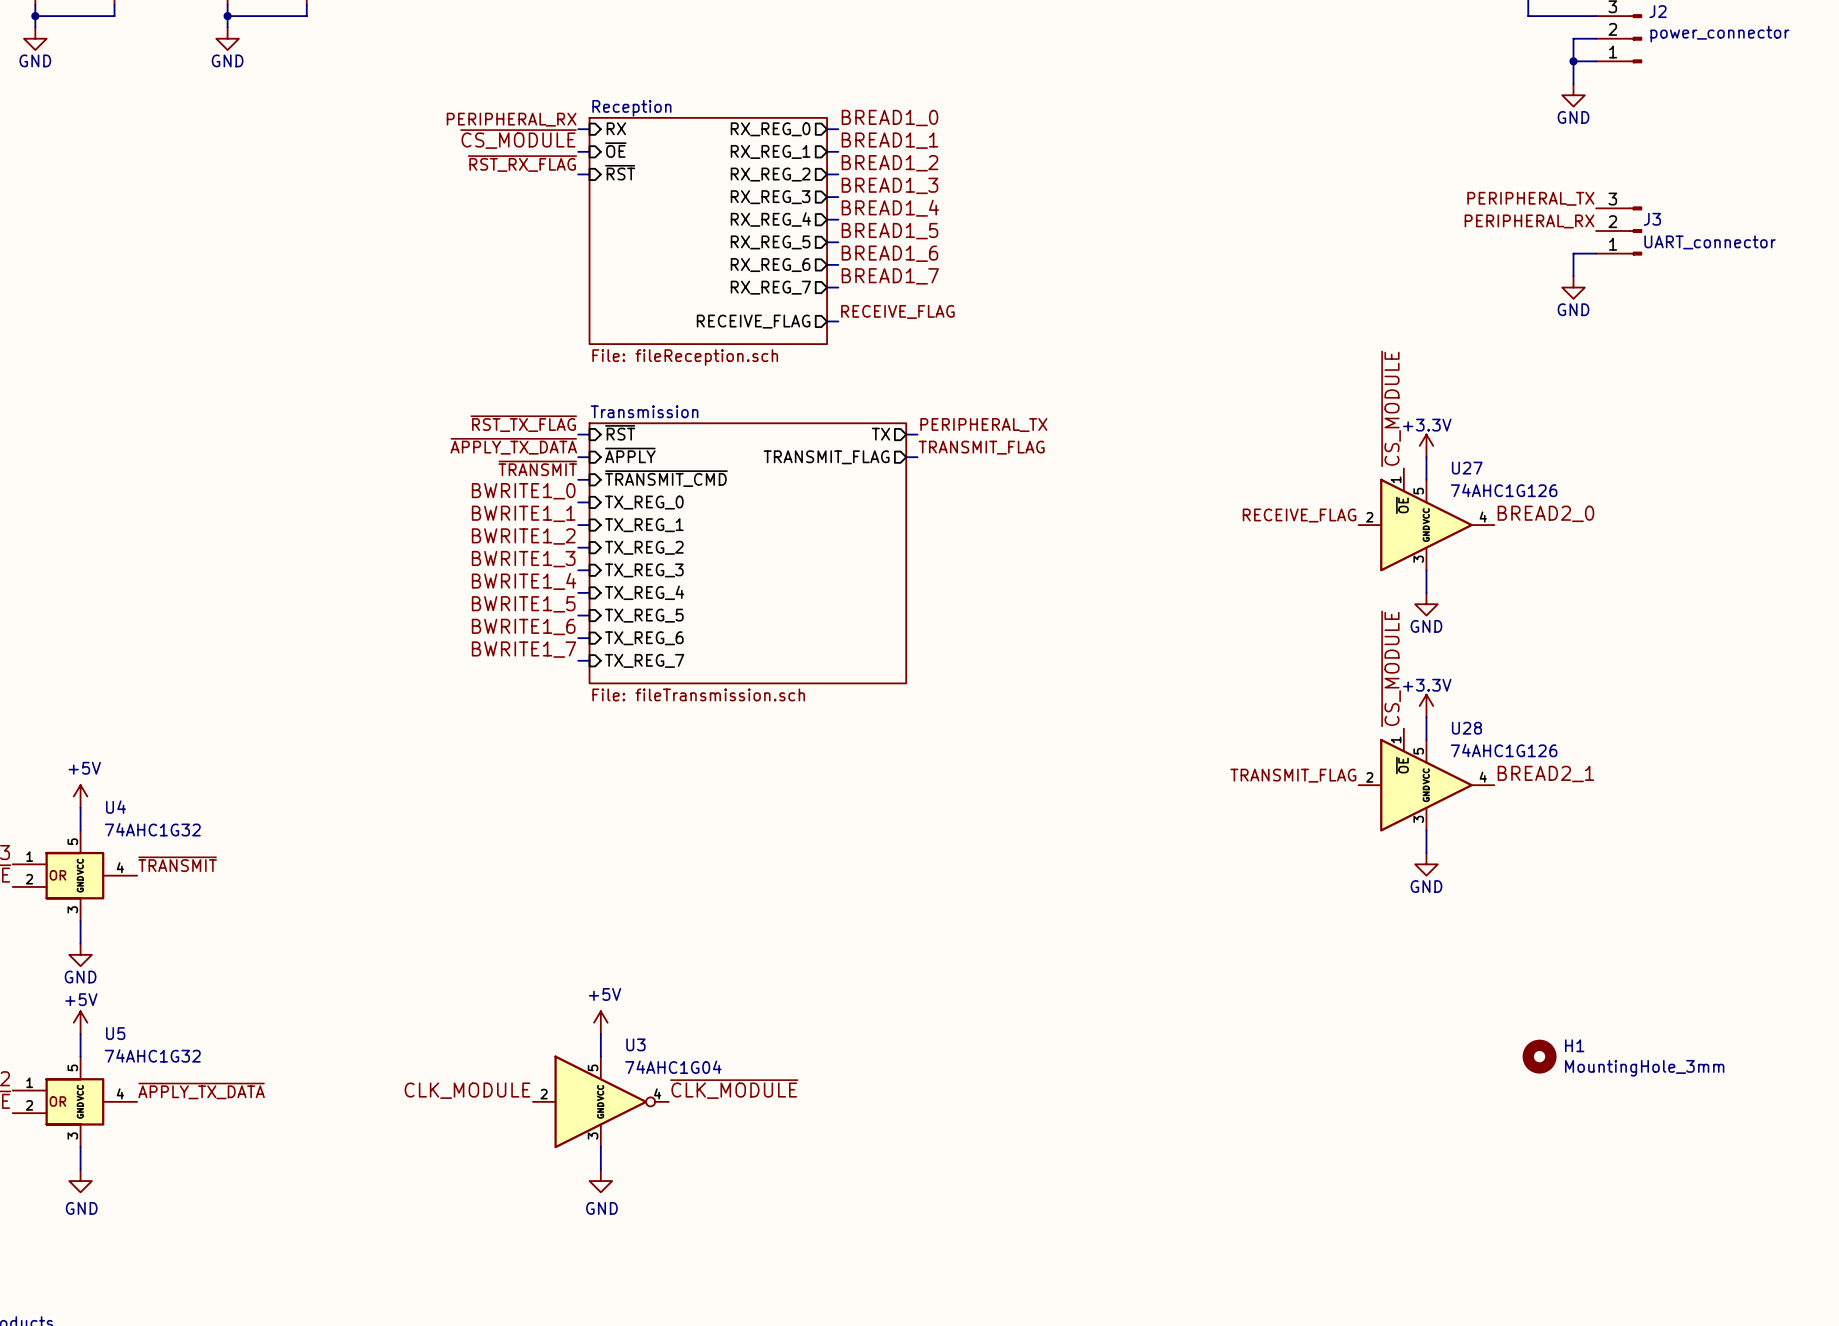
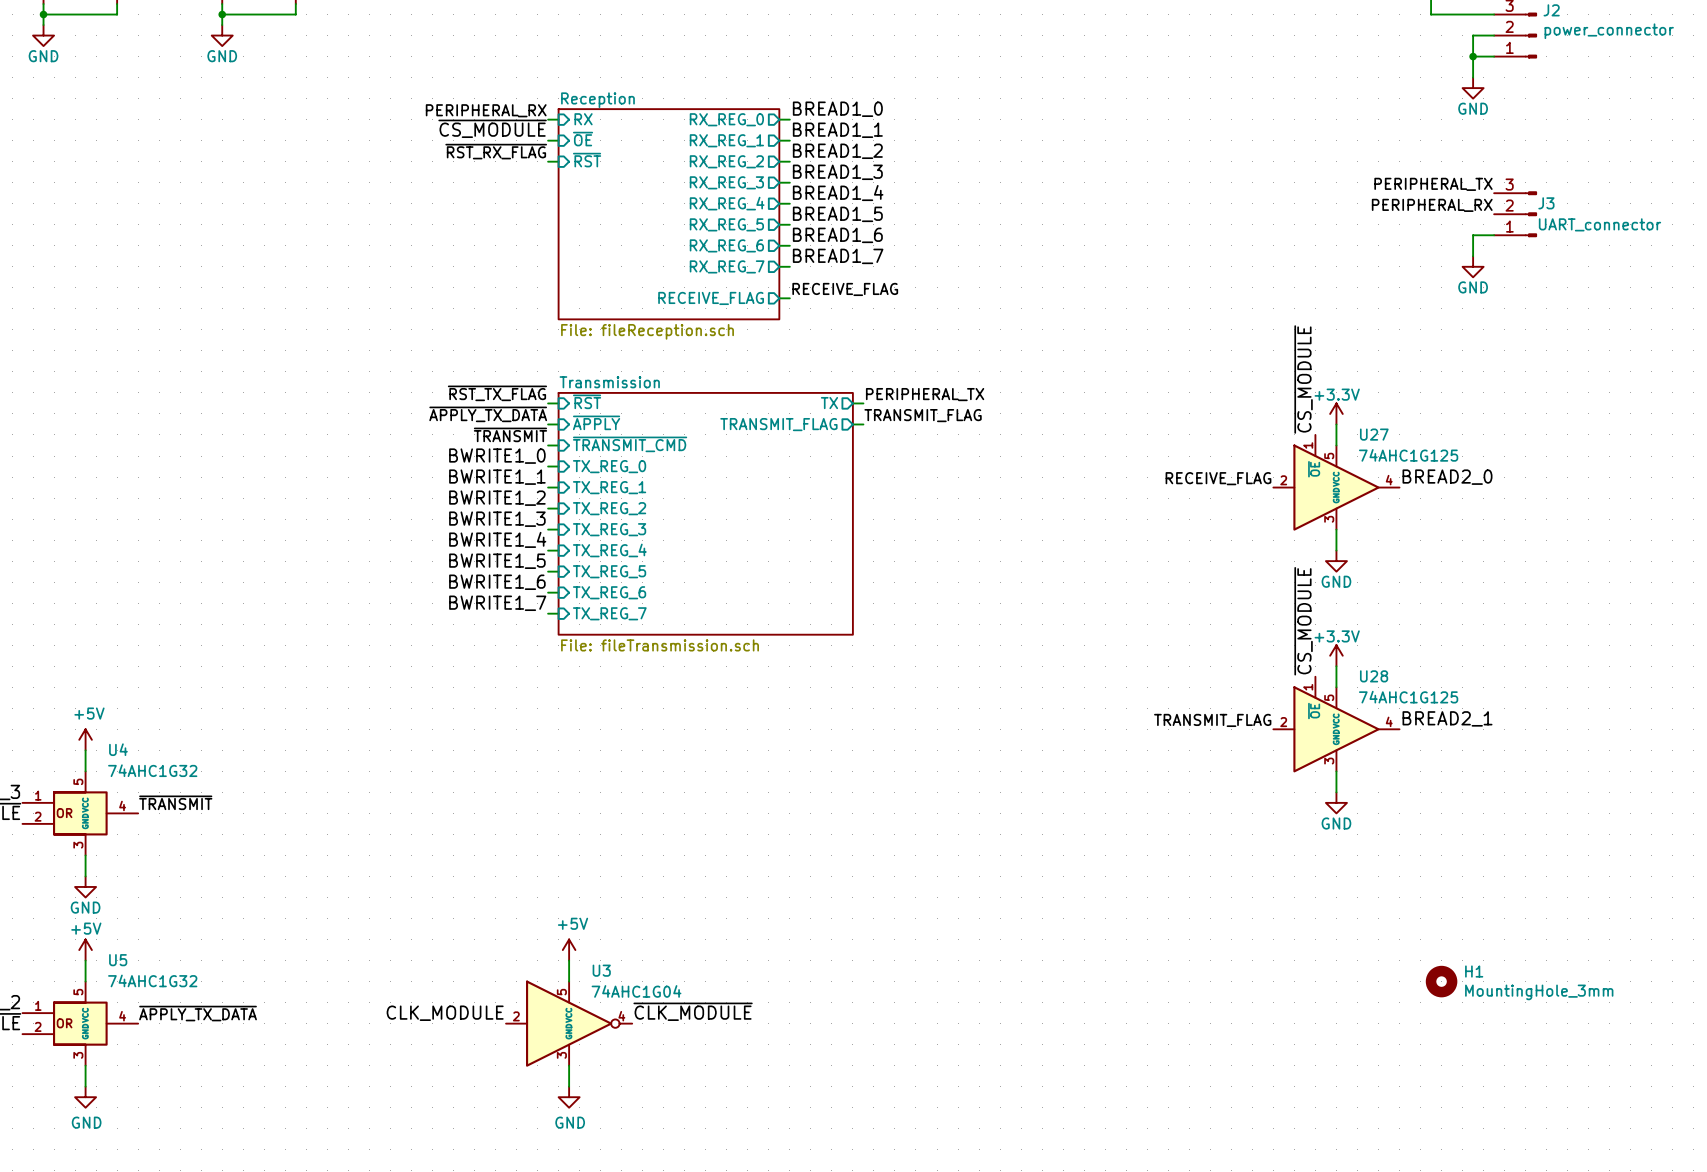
U27 value: 74AHC1G126 (1504, 490) -> 74AHC1G125 (1408, 455)
U28 value: 74AHC1G126 (1504, 750) -> 74AHC1G125 (1408, 697)

